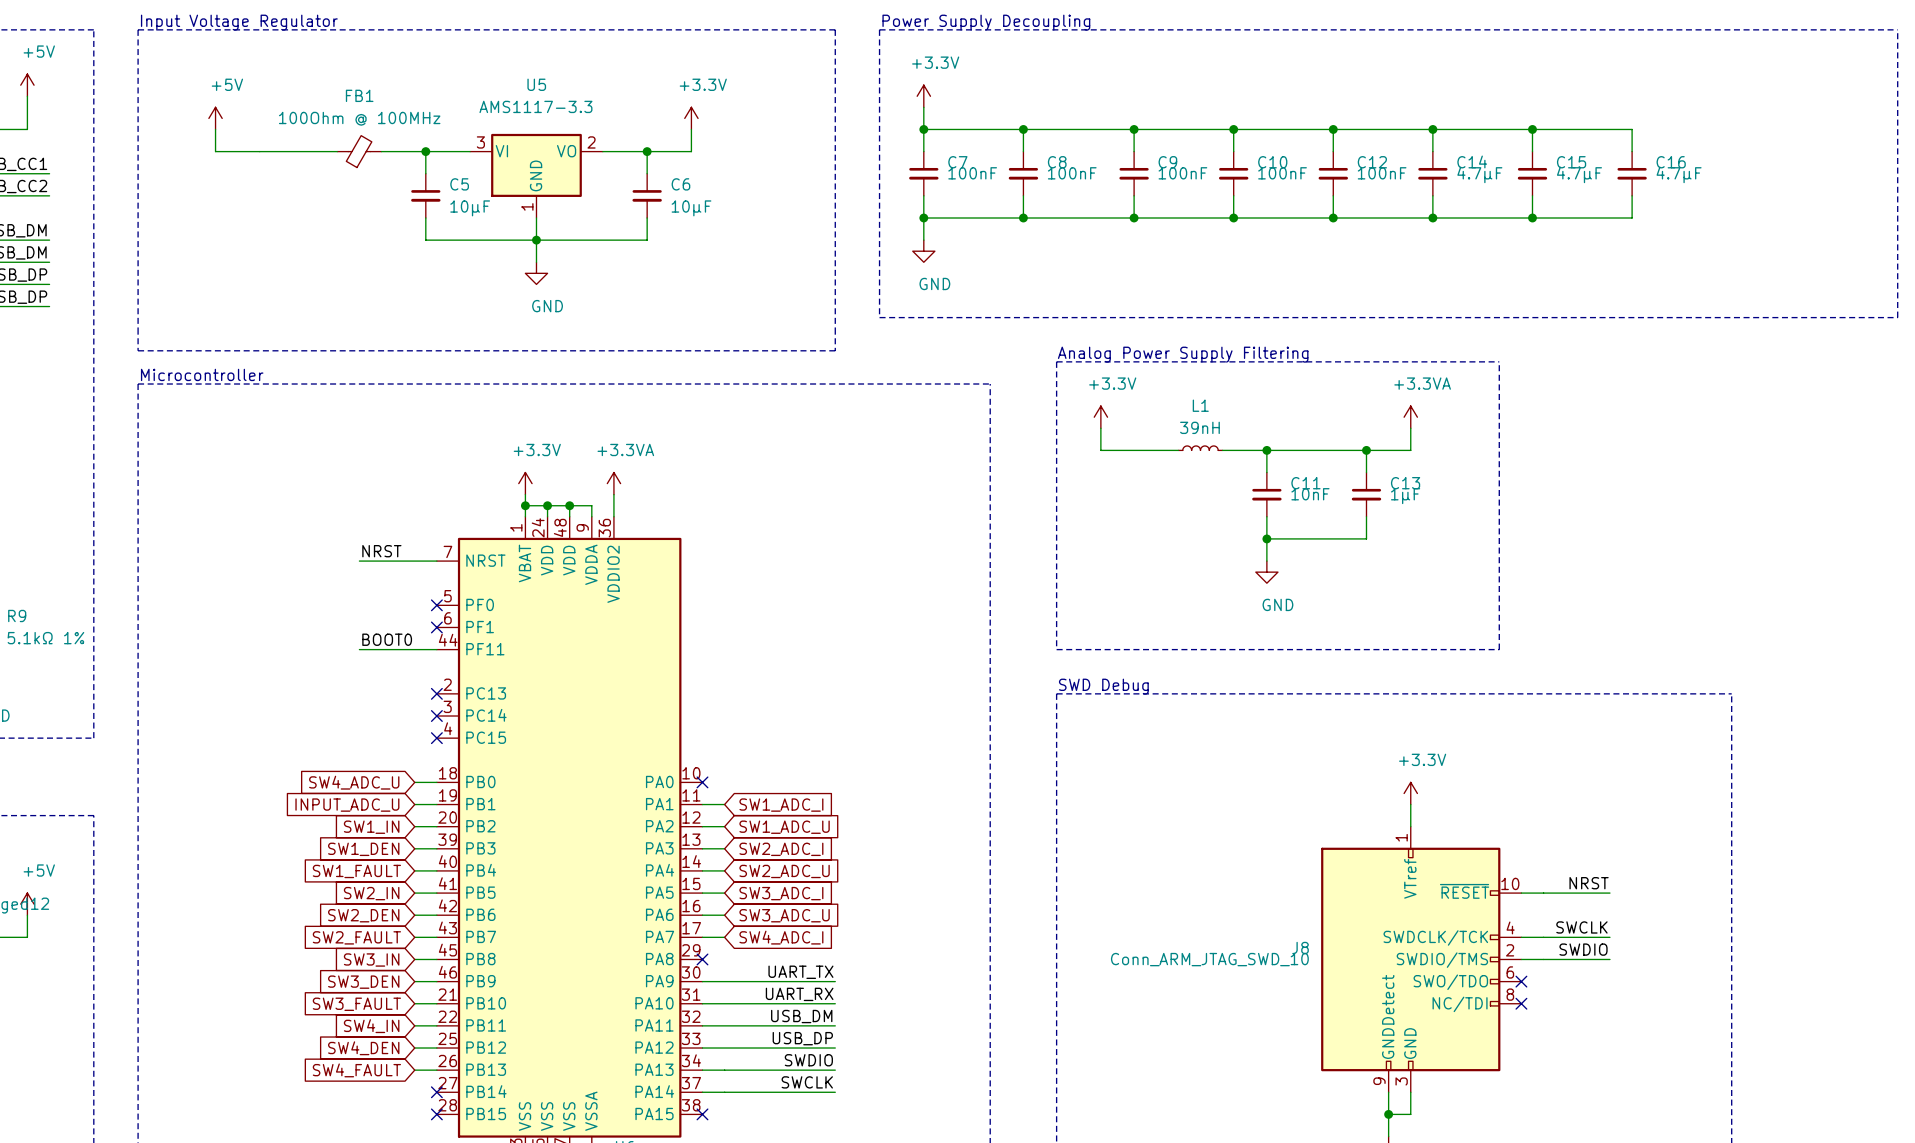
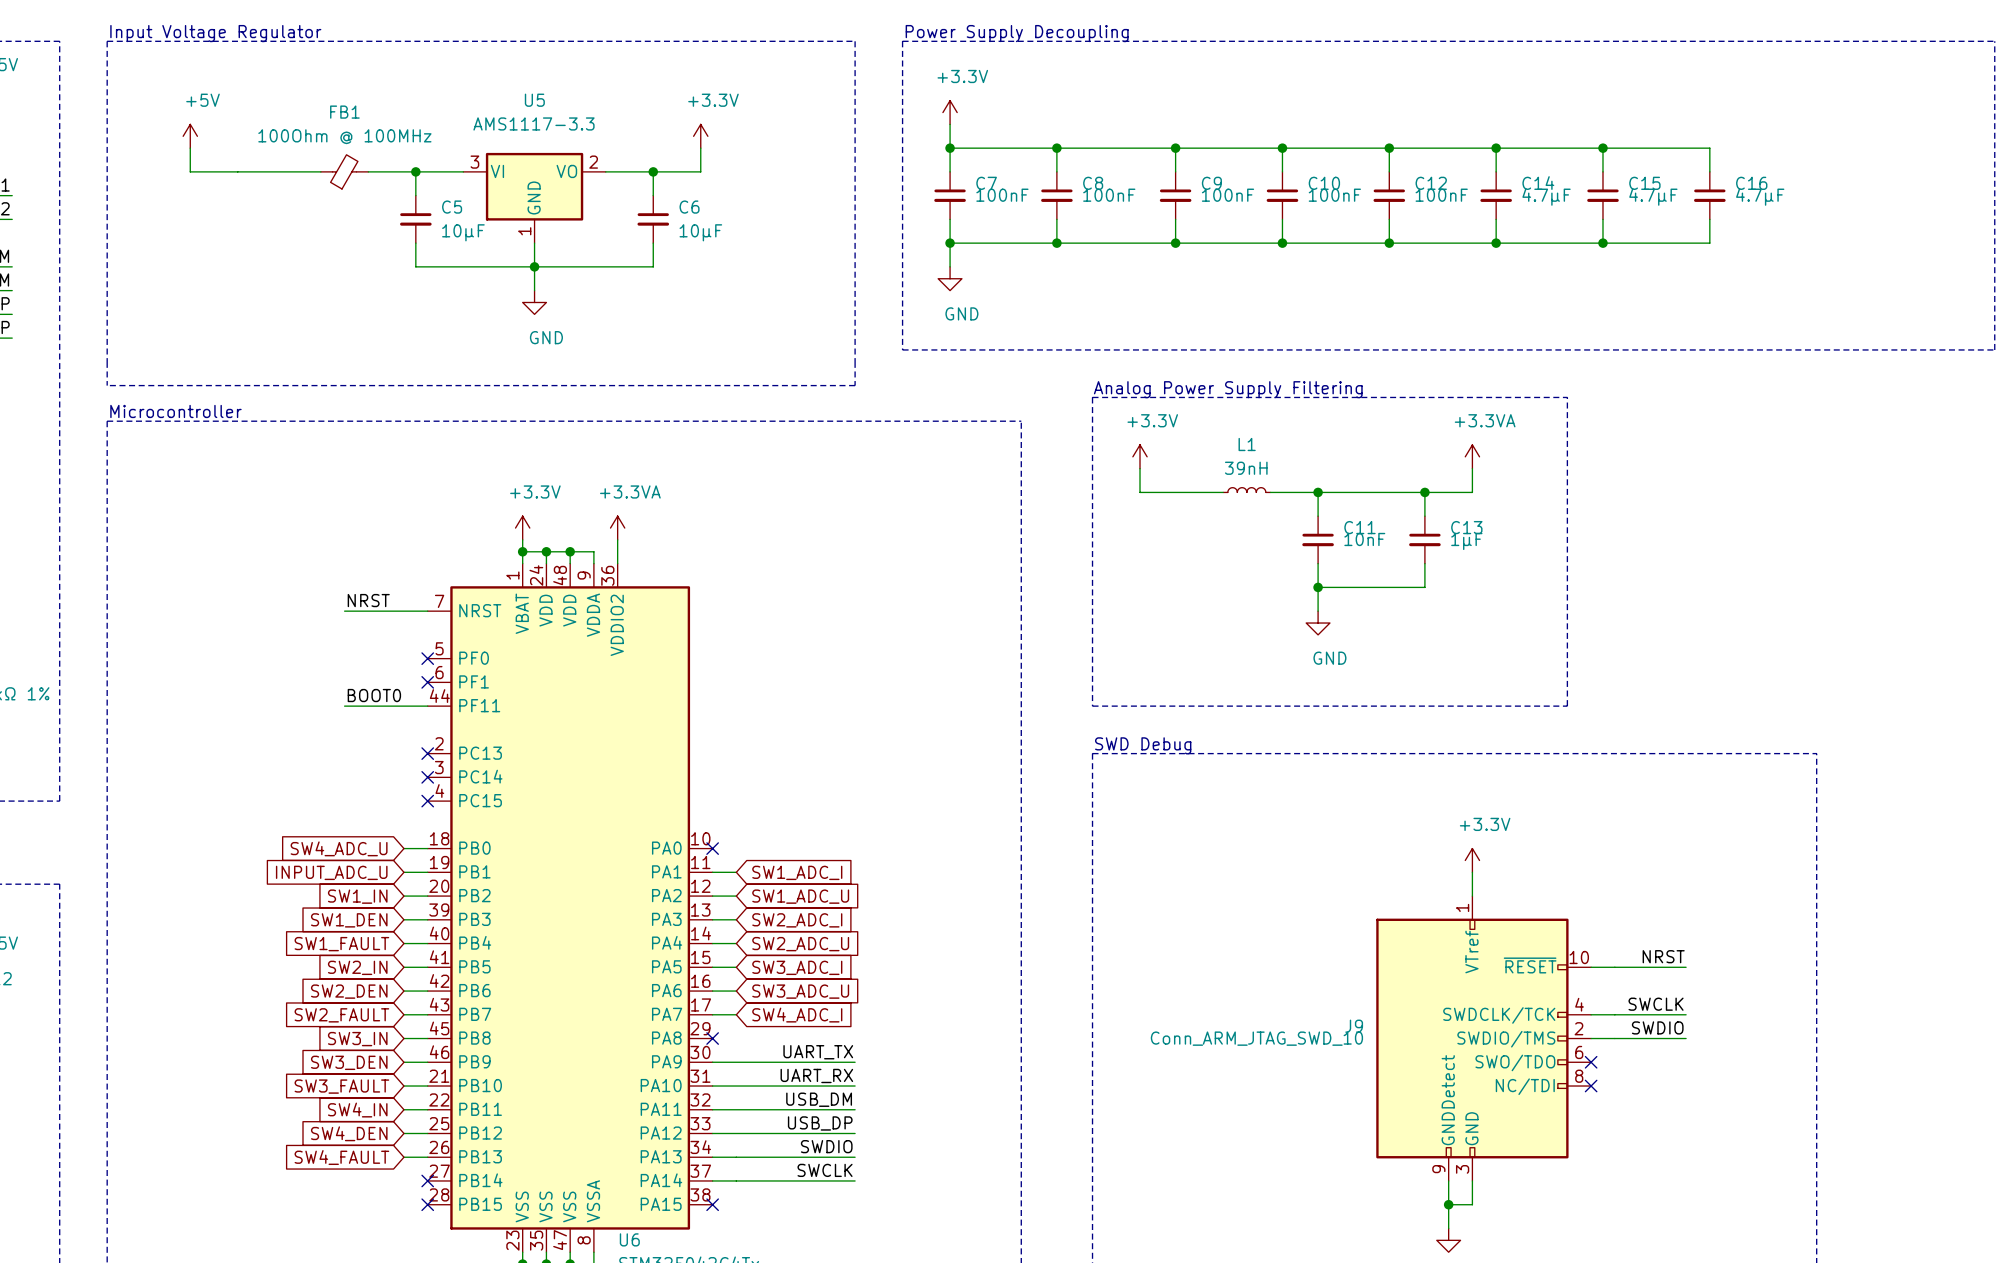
J8 name: J8 (1300, 947) -> J9 (1354, 1026)

